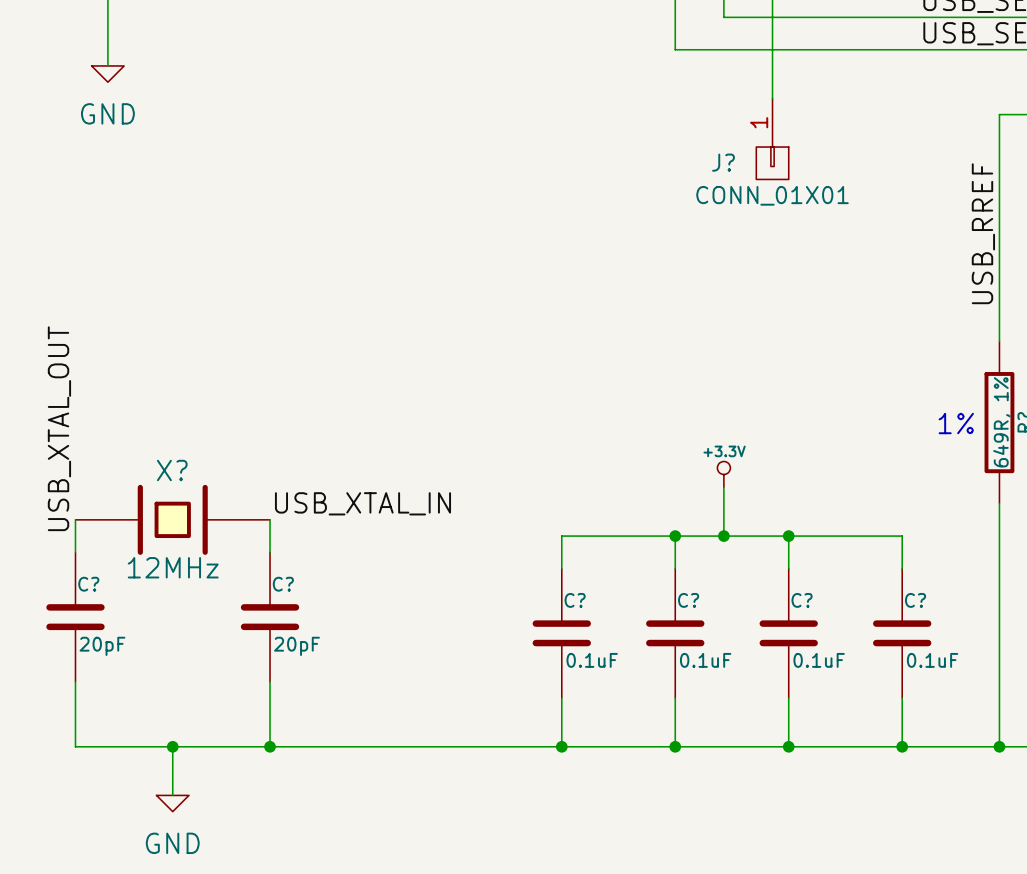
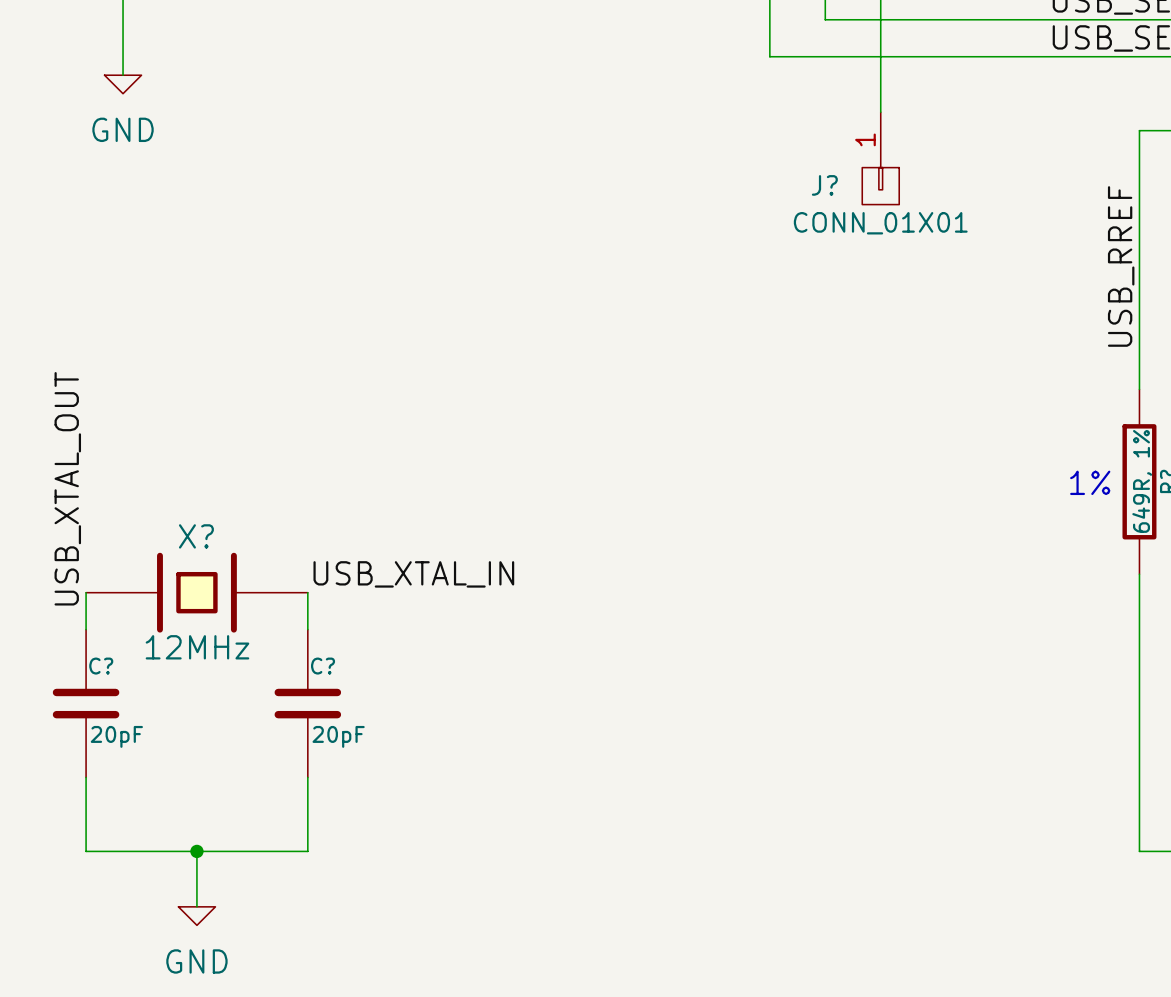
power symbol: +3.3V (723, 474) -> none
wire: (723, 487) (723, 536) -> none
wire: (675, 536) (675, 568) -> none
junction: (675, 536) -> none
junction: (723, 536) -> none
wire: (788, 536) (788, 568) -> none
junction: (788, 536) -> none
wire: (561, 568) (561, 536) (902, 536) (902, 568) -> none
C?: 0.1uF (561, 633) -> none
C?: 0.1uF (675, 633) -> none
C?: 0.1uF (788, 633) -> none
C?: 0.1uF (902, 633) -> none
wire: (561, 698) (561, 746) -> none
wire: (675, 698) (675, 746) -> none
wire: (788, 698) (788, 746) -> none
wire: (902, 698) (902, 746) -> none
wire: (270, 746) (999, 746) -> none
junction: (270, 746) -> none
junction: (561, 746) -> none
junction: (675, 746) -> none
junction: (788, 746) -> none
junction: (902, 746) -> none
junction: (999, 746) -> none

